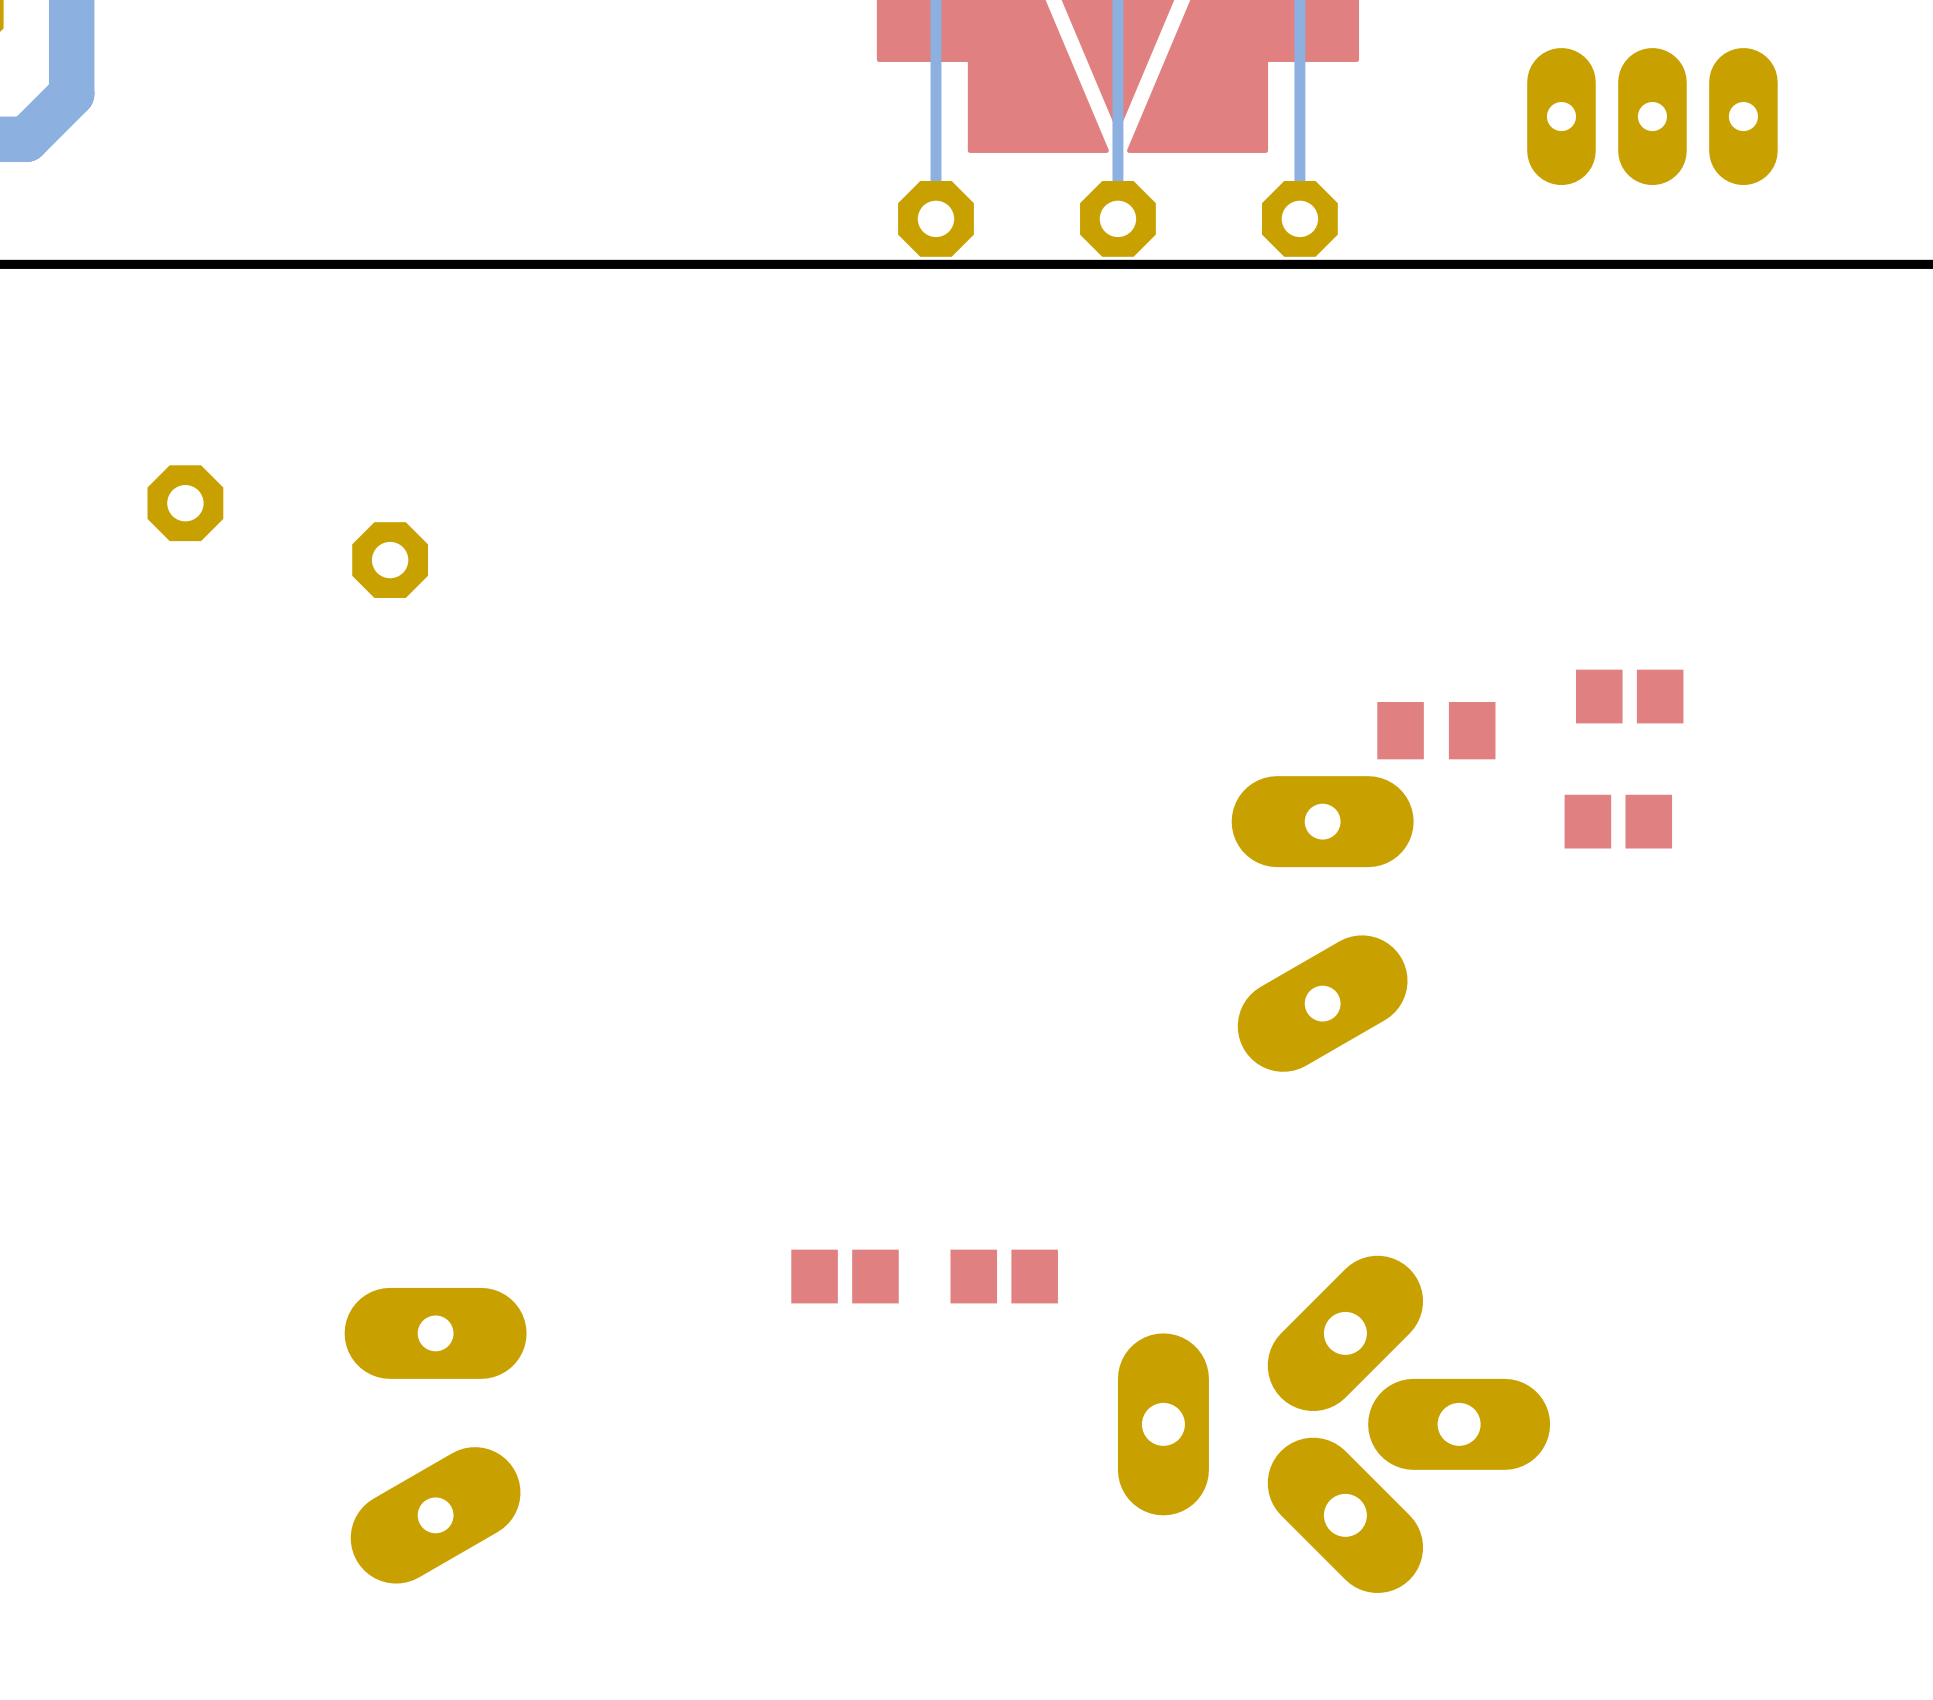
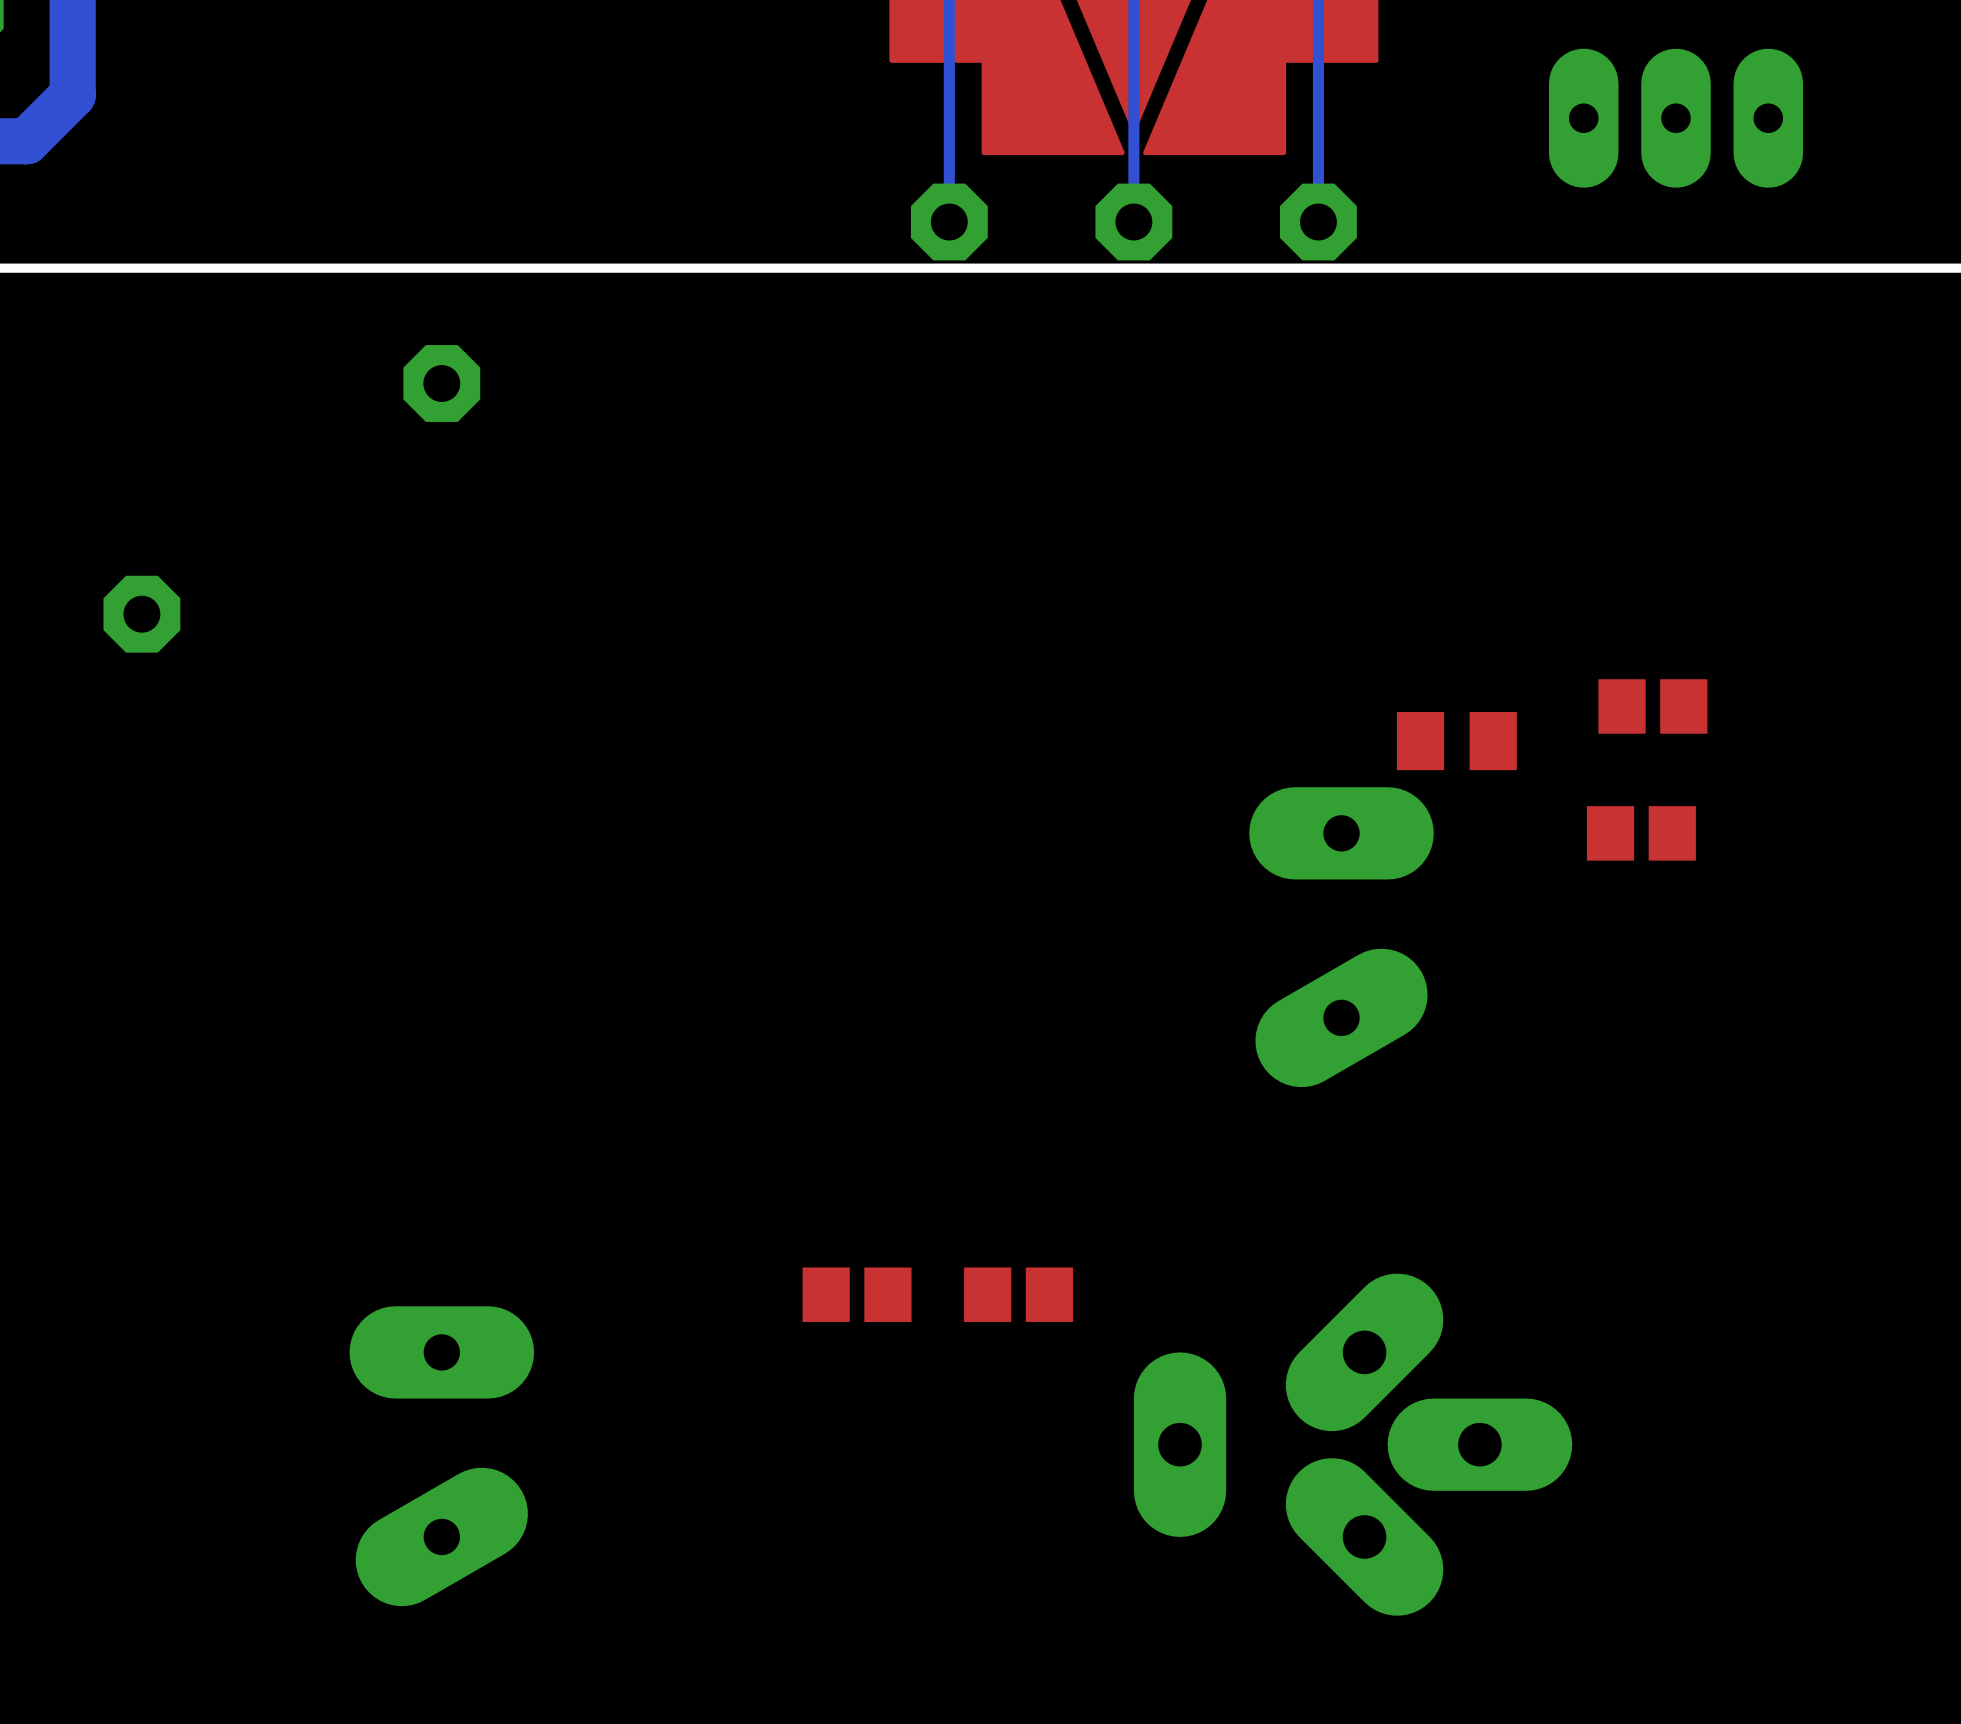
part: none -> (441, 383)
part position: (185, 503) -> (141, 614)
part: (390, 560) -> none

